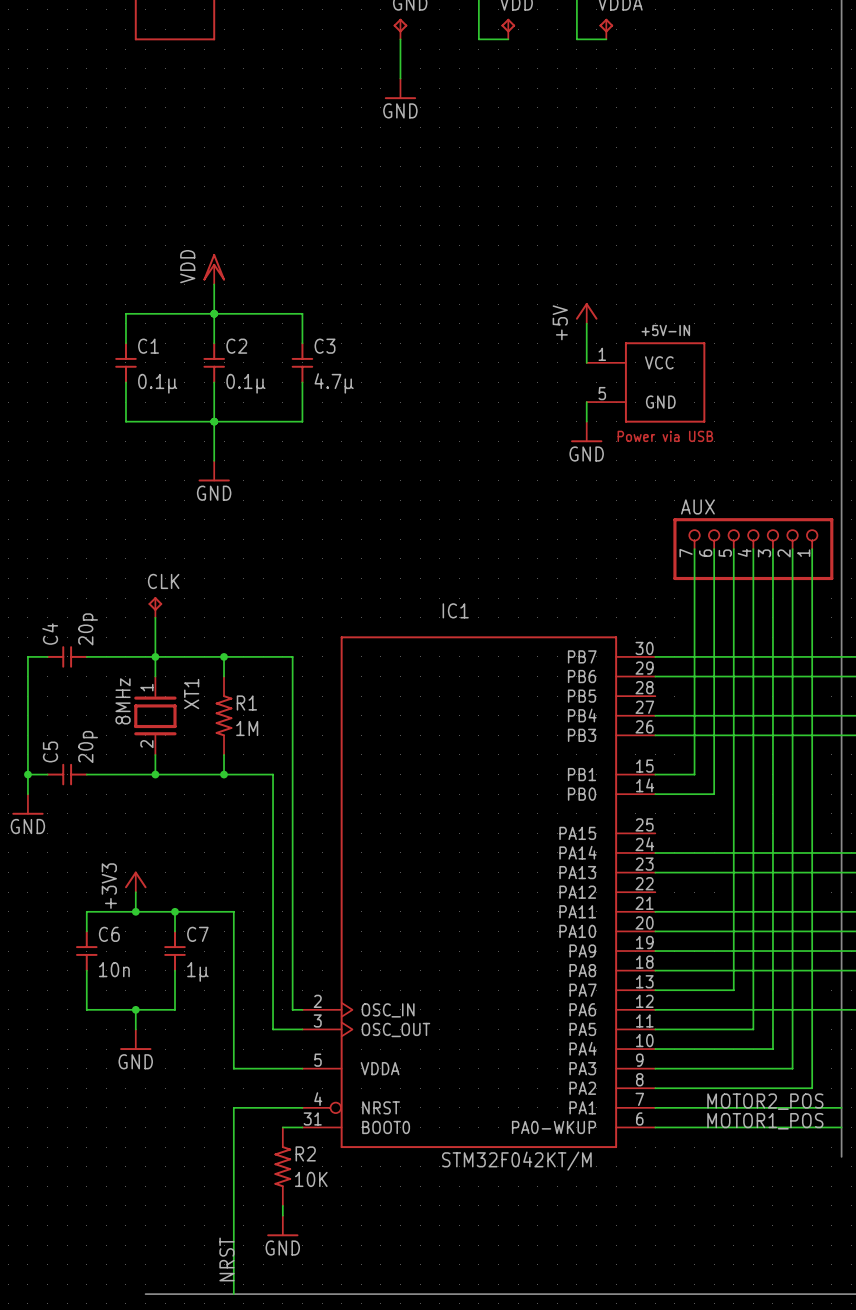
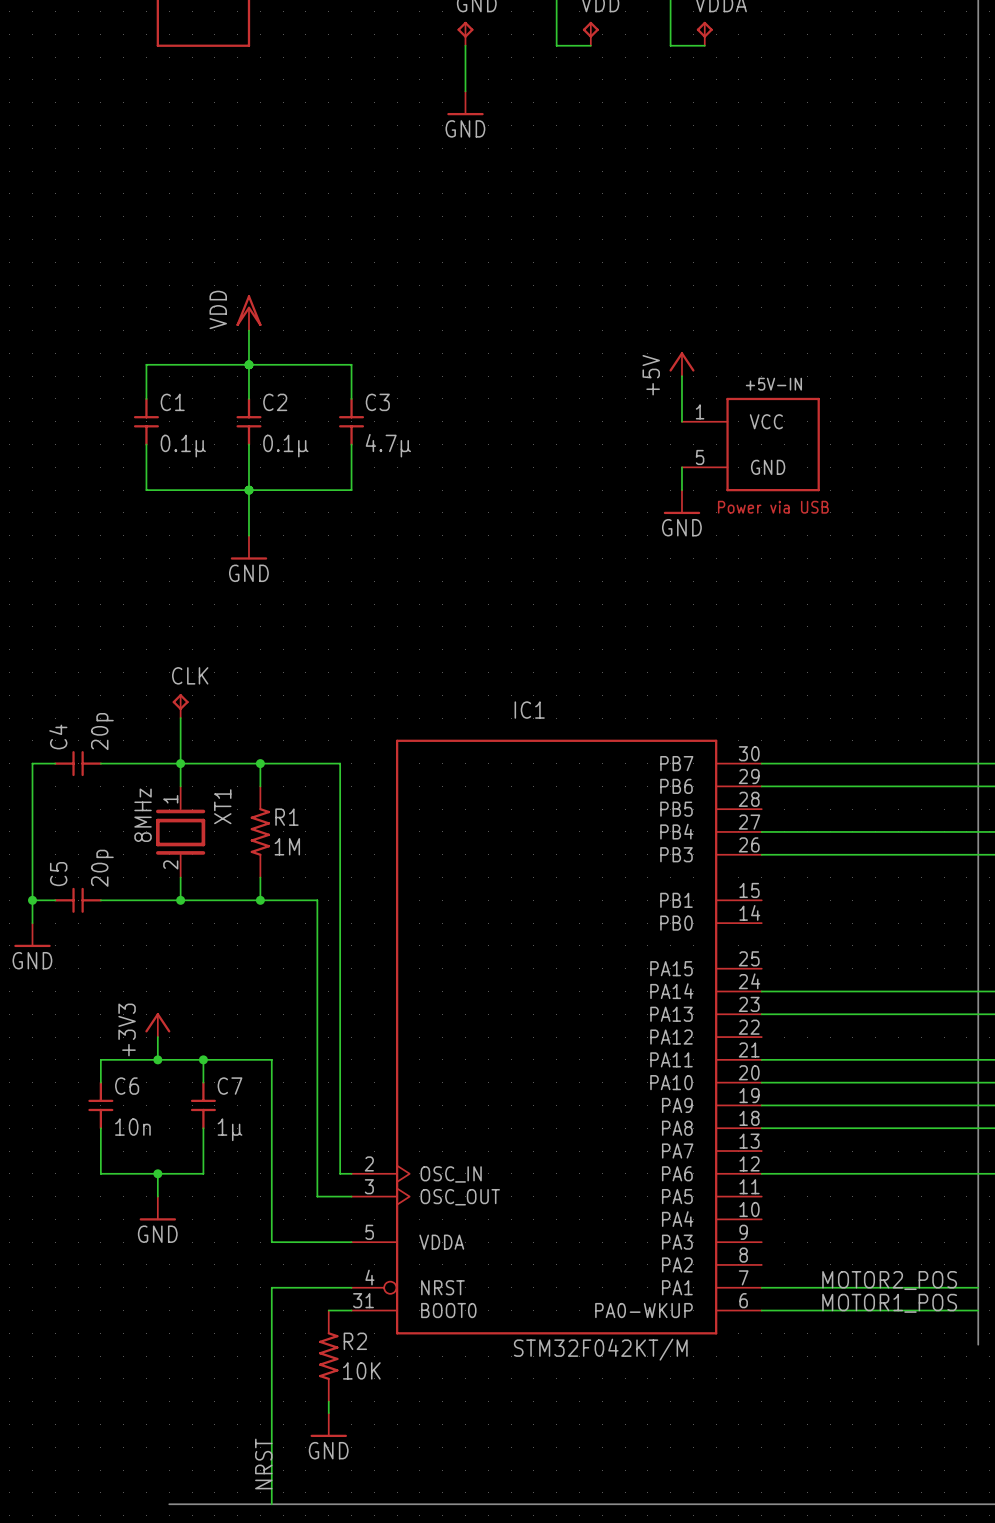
wire: (694, 549) (694, 774) (655, 774) -> none
wire: (714, 549) (714, 794) (655, 794) -> none
wire: (733, 549) (733, 990) (655, 990) -> none
wire: (753, 549) (753, 1029) (655, 1029) -> none
AUX: (753, 549) -> none
wire: (772, 549) (772, 1049) (655, 1049) -> none
wire: (792, 549) (792, 1068) (655, 1068) -> none
wire: (812, 549) (812, 1088) (655, 1088) -> none

